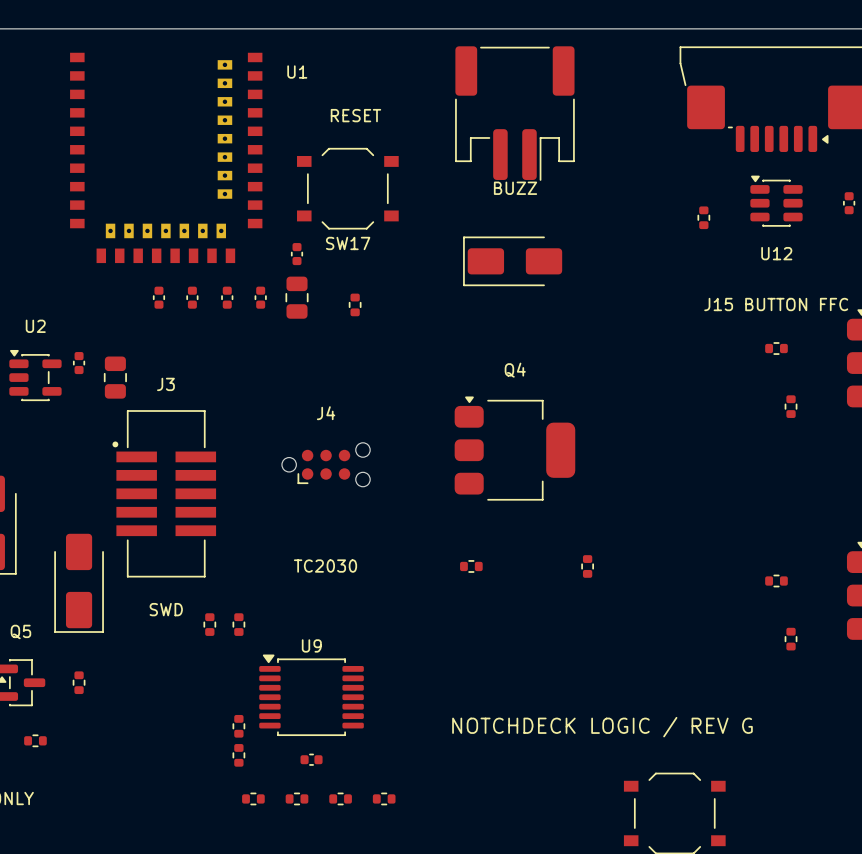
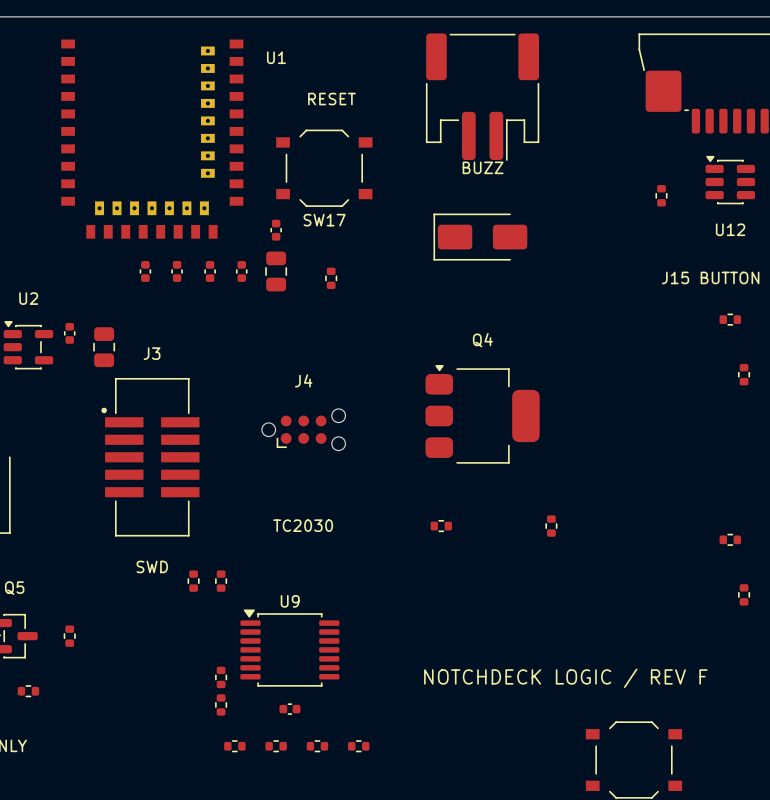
part: (79, 583) -> none
text: NOTCHDECK LOGIC / REV G (602, 727) -> NOTCHDECK LOGIC / REV F (565, 678)

